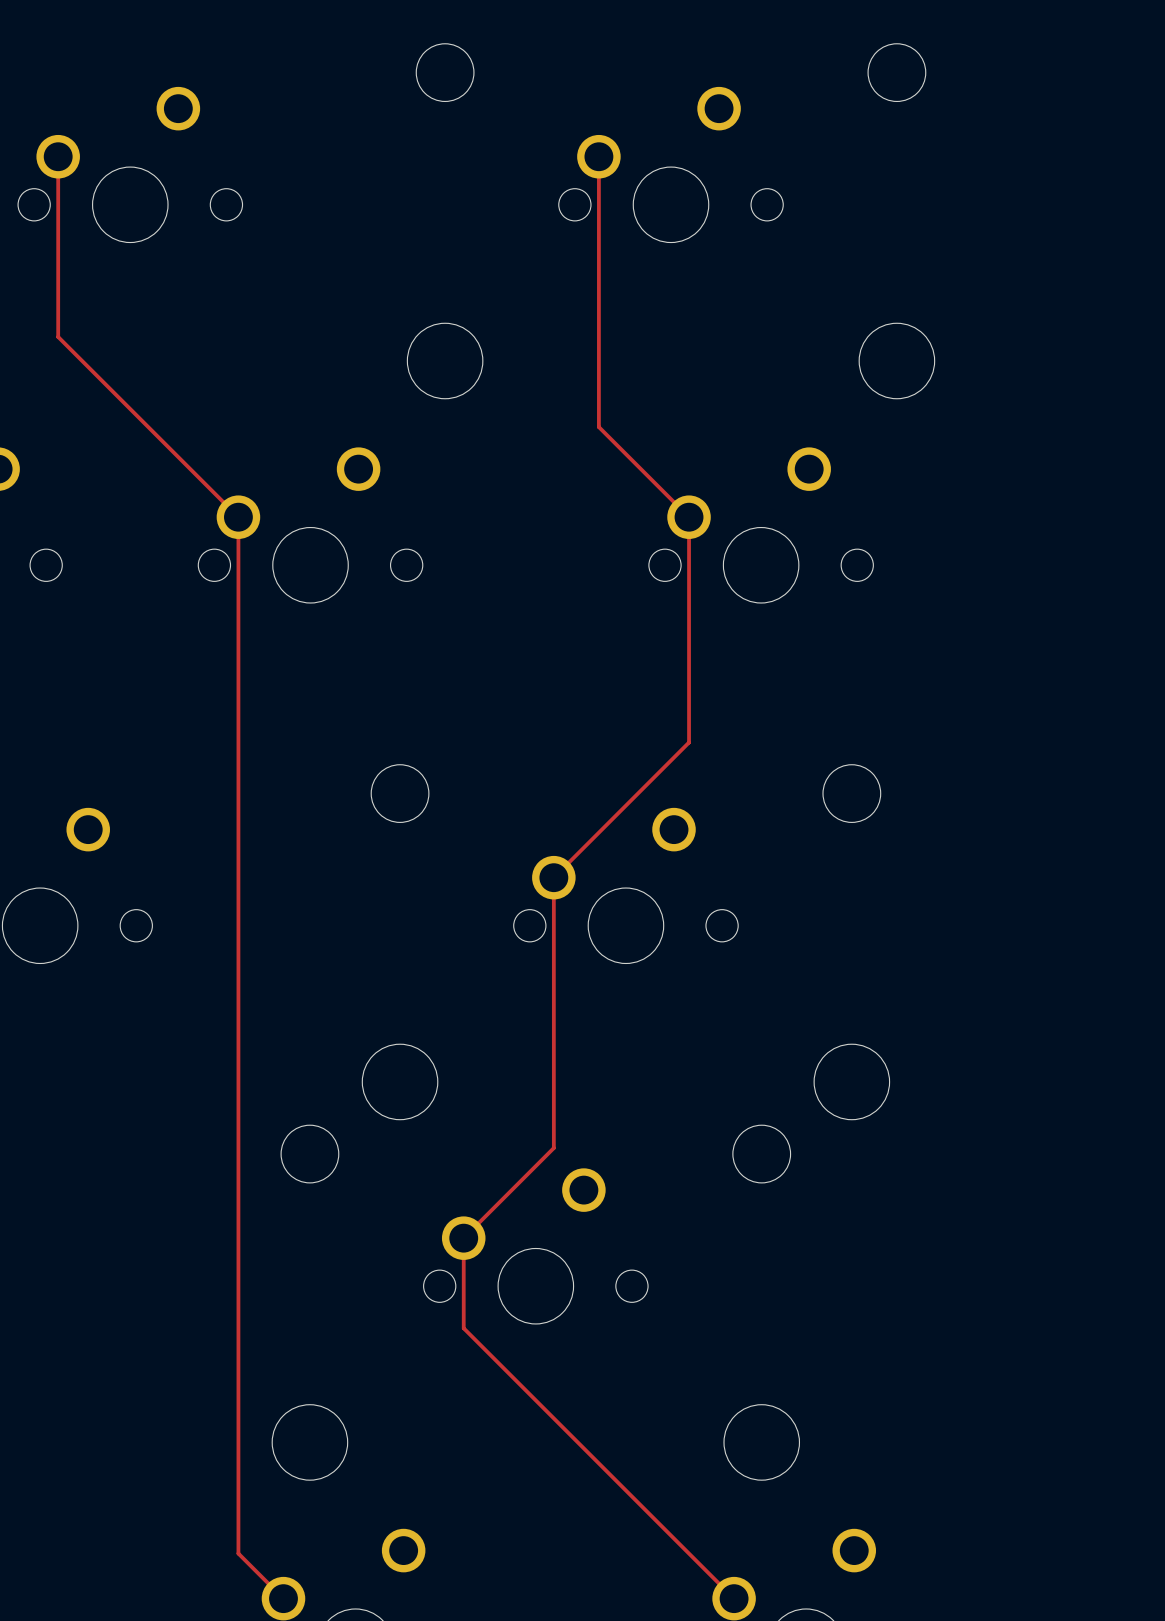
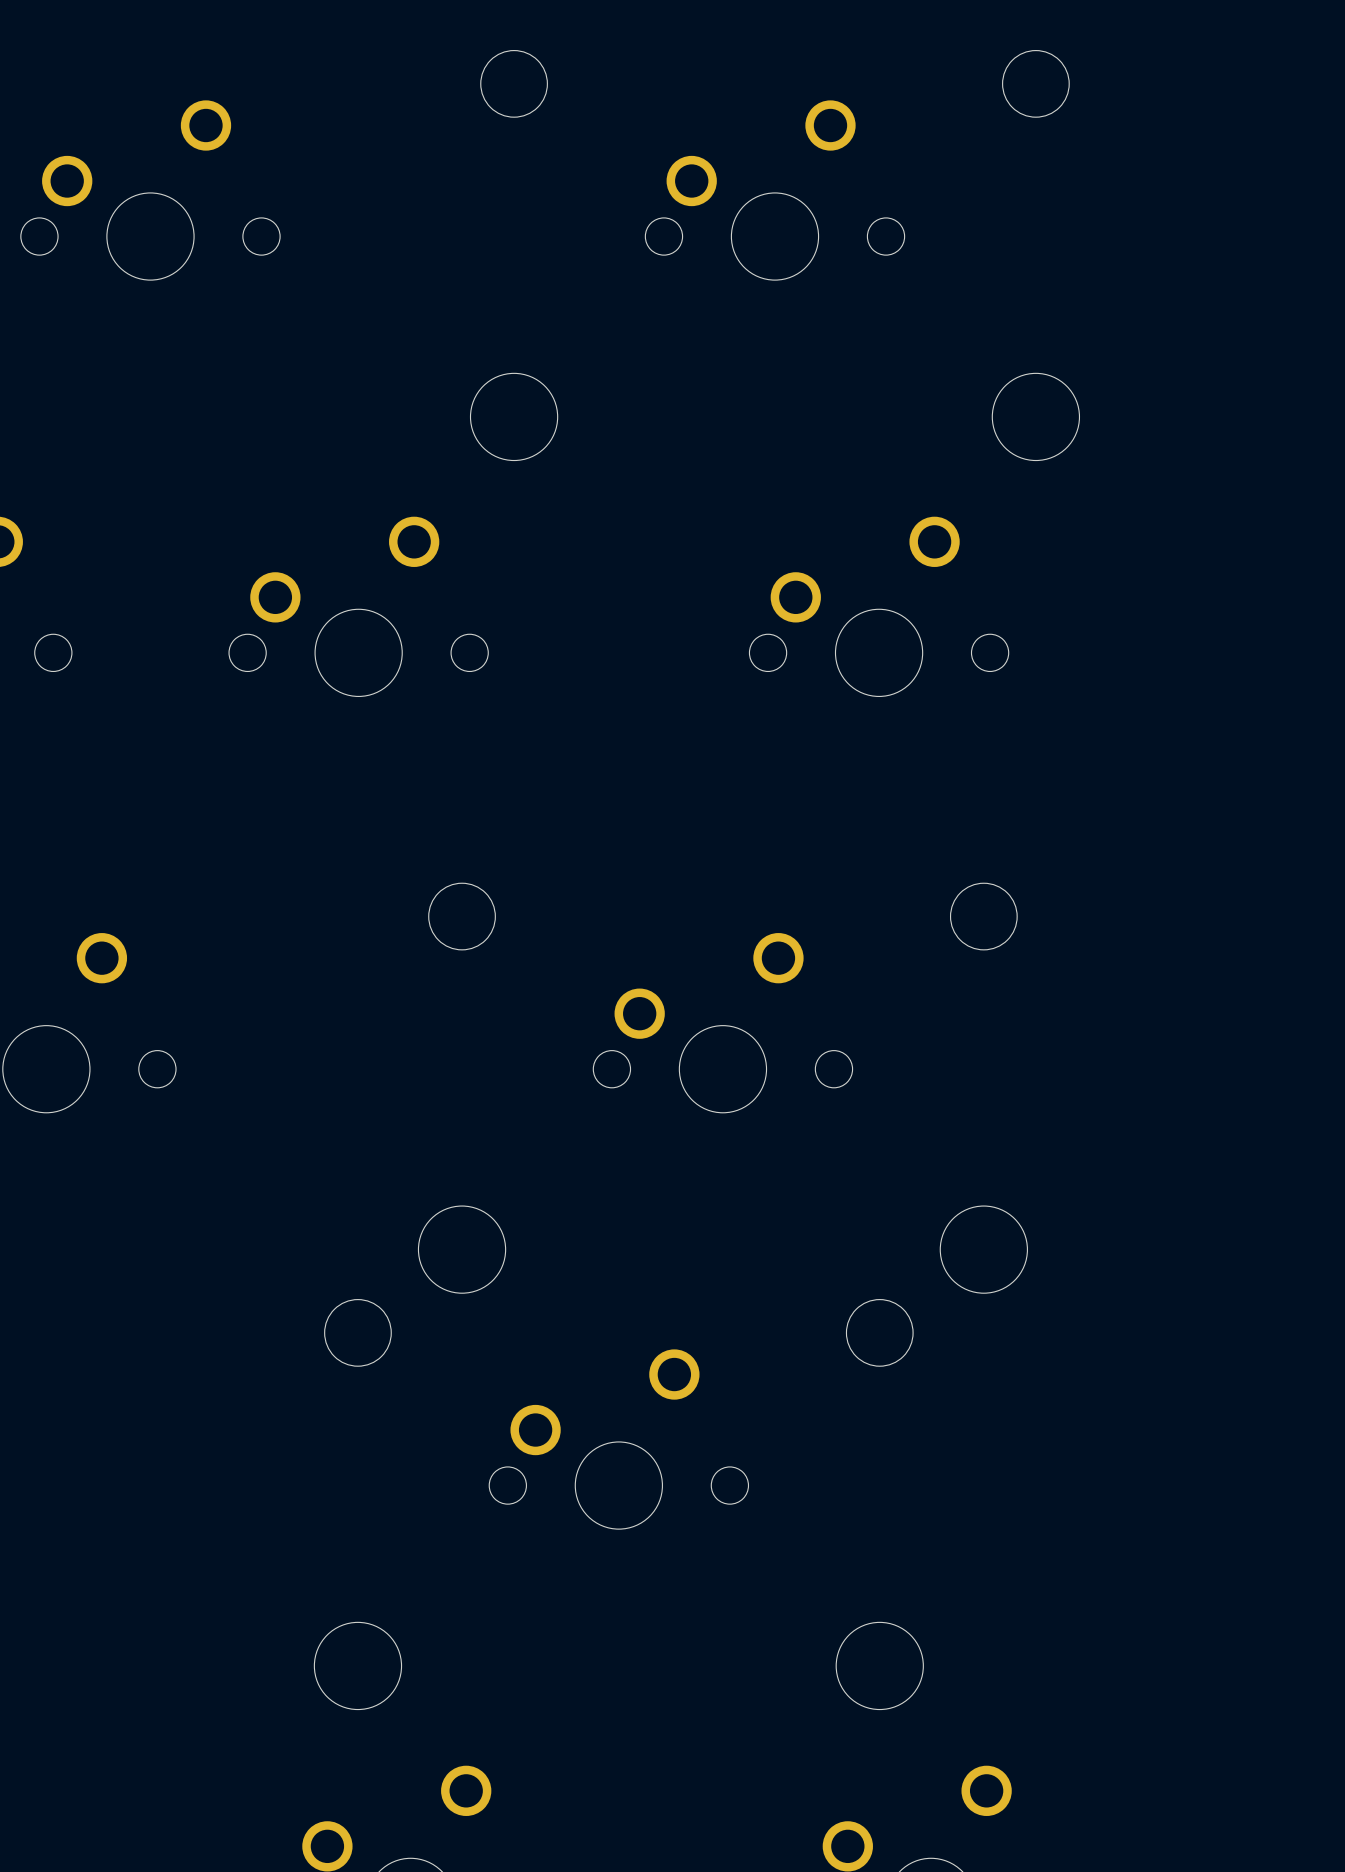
track: (58, 156) (58, 336) (238, 517) (238, 1553) (283, 1598) -> none
track: (598, 156) (598, 427) (689, 517) (689, 742) (553, 877) (553, 1148) (463, 1238) (463, 1328) (734, 1598) -> none

